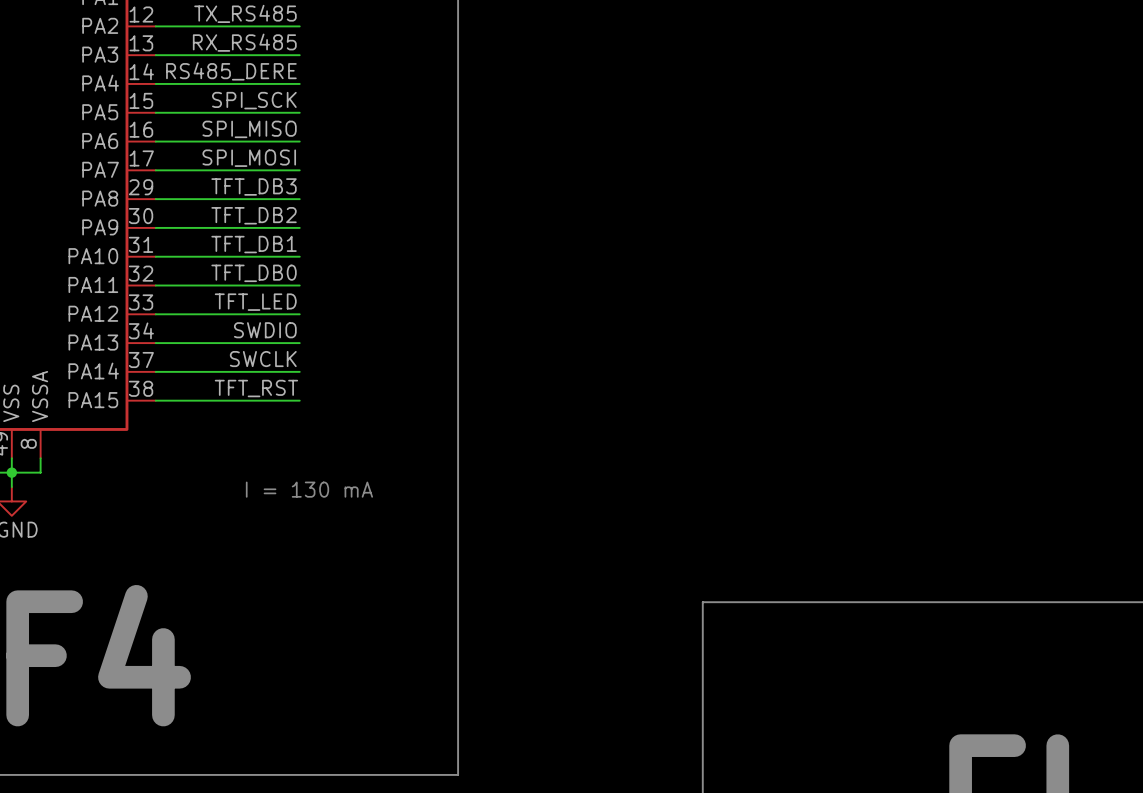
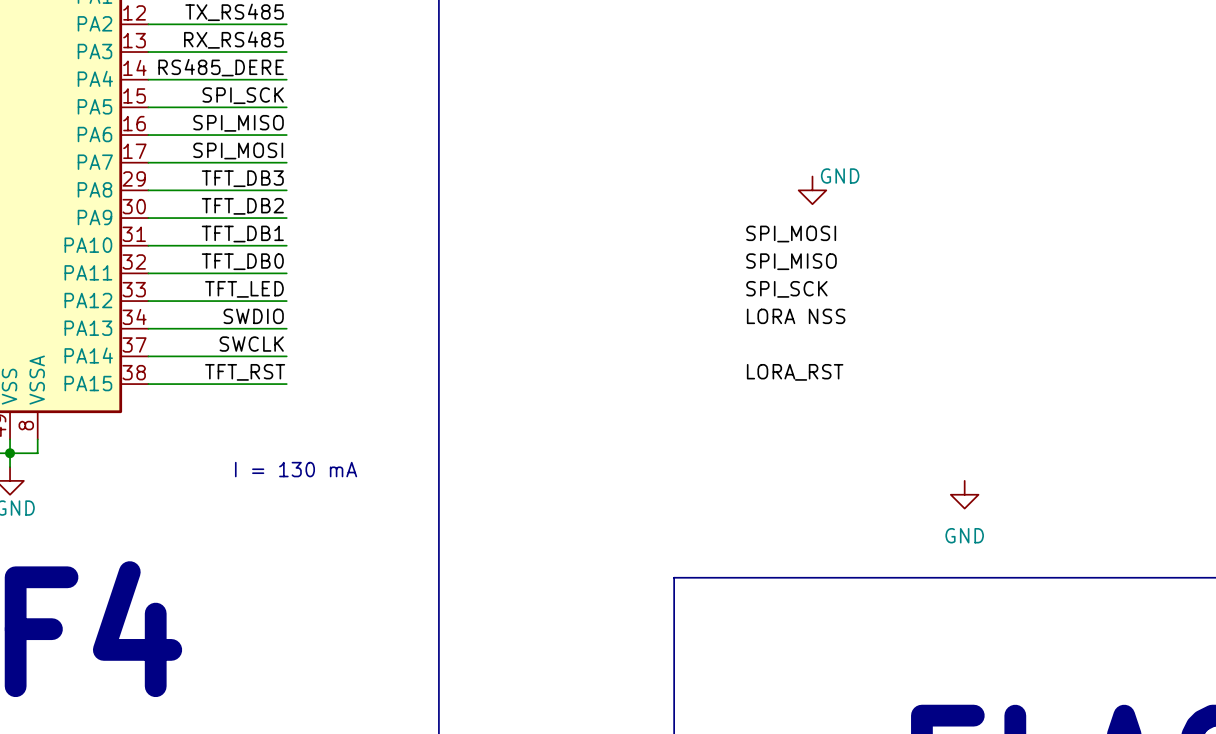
power symbol: none -> GND (812, 190)
label: none -> SPI_MOSI (791, 234)
label: none -> SPI_MISO (791, 261)
label: none -> SPI_SCK (786, 289)
label: none -> LORA NSS (796, 316)
label: none -> LORA_RST (795, 372)
power symbol: none -> GND (964, 494)

